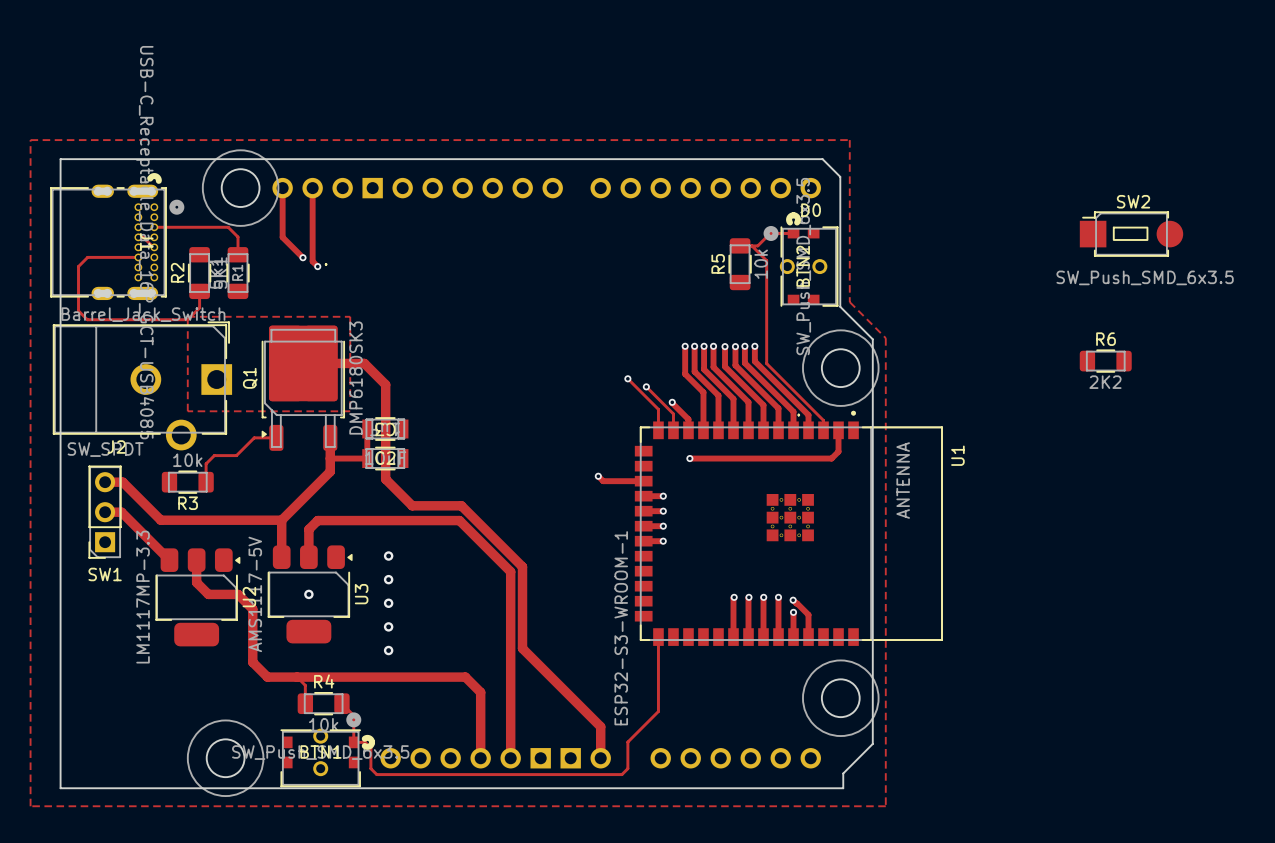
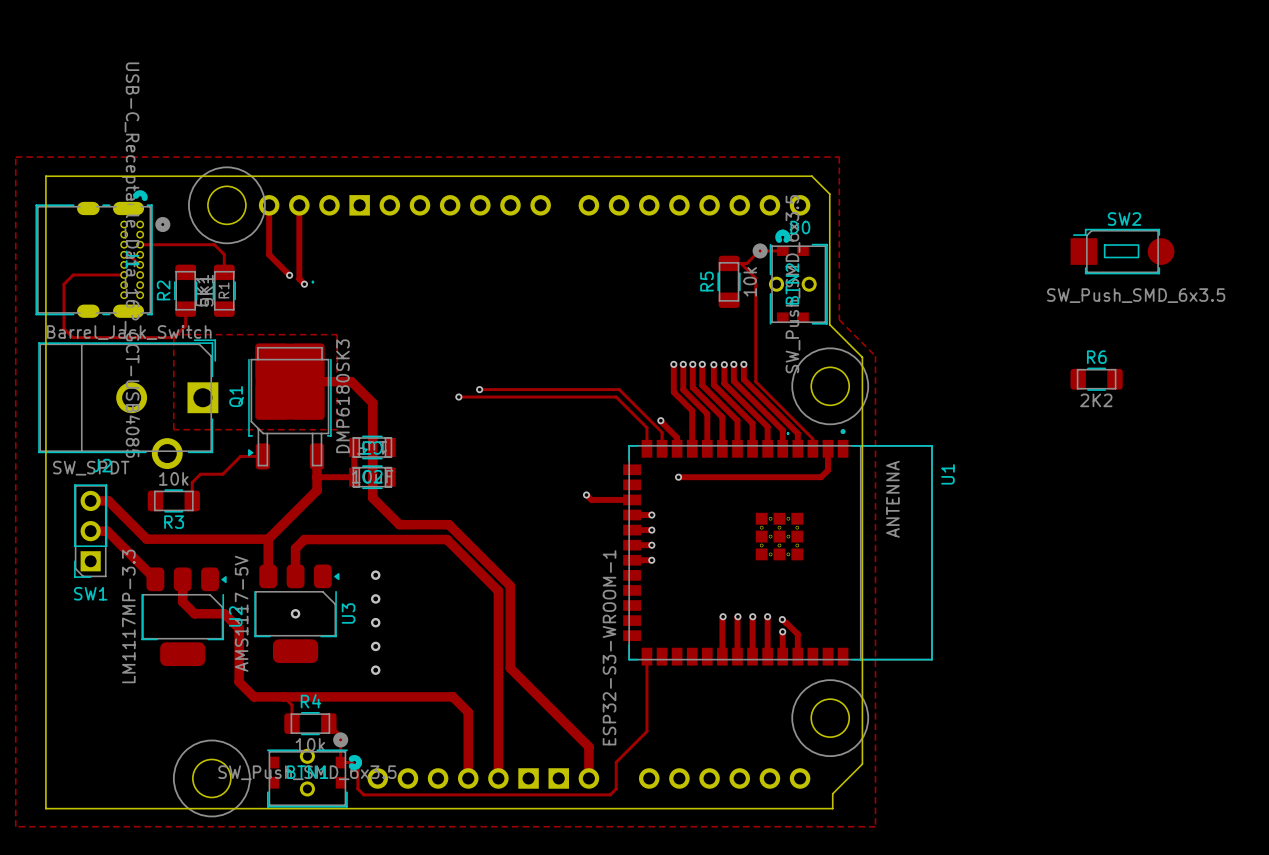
track: none -> (479, 389) (619, 389) (634, 405)
via: none -> (479, 389)
track: none -> (458, 397) (616, 397)
via: none -> (458, 397)
via: (627, 378) -> none
via: (646, 386) -> none

